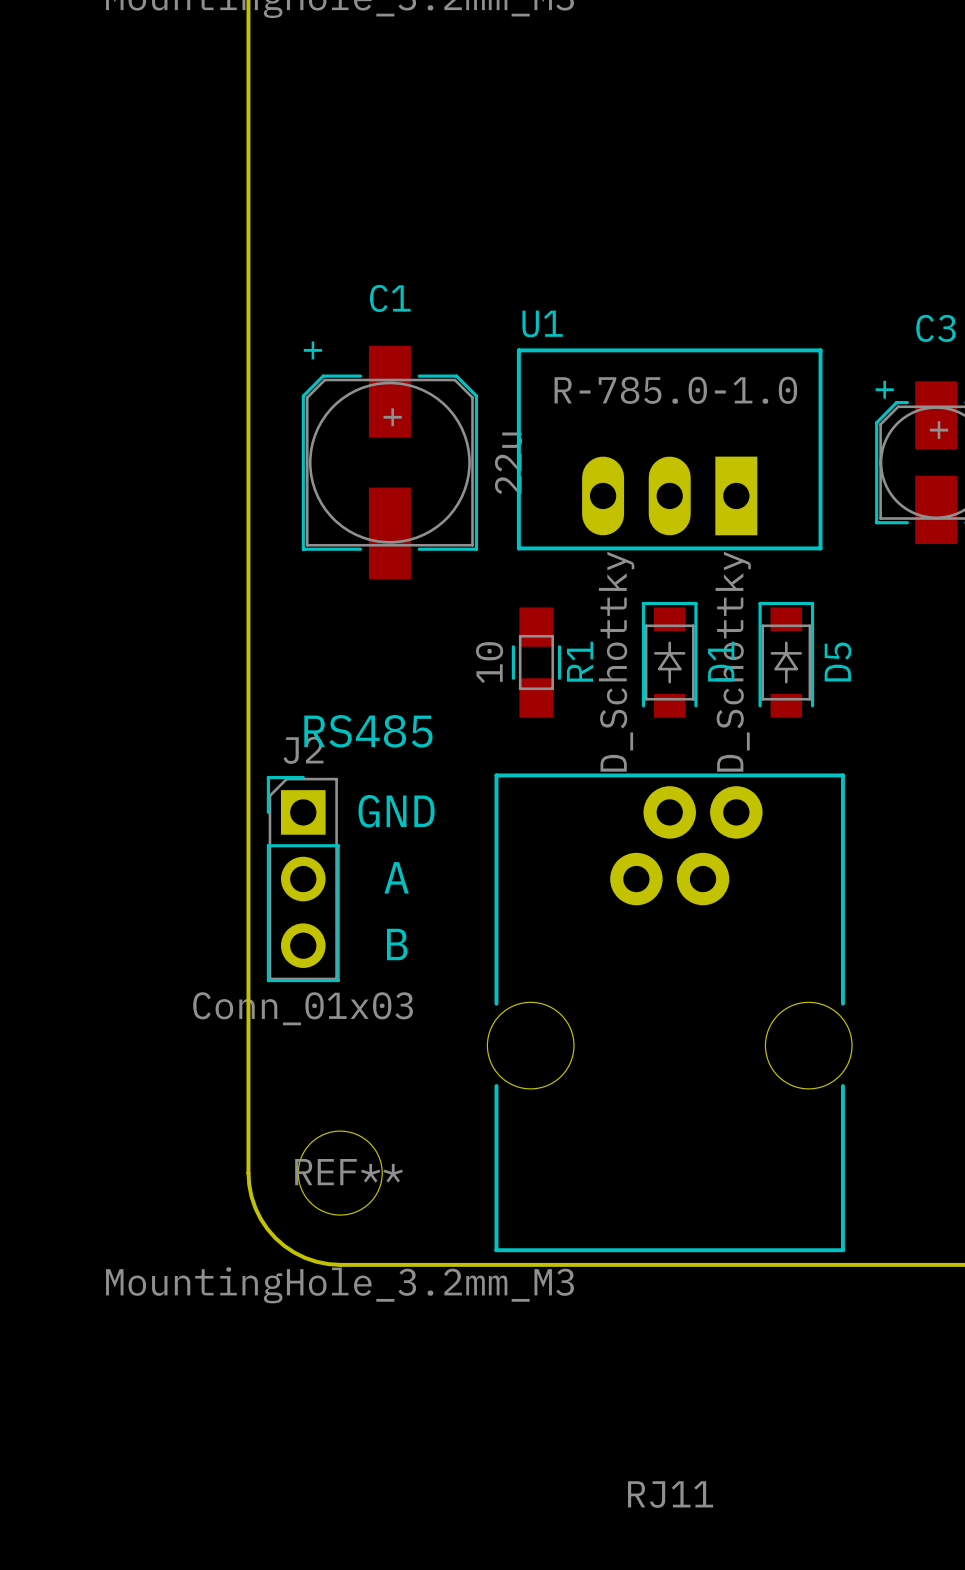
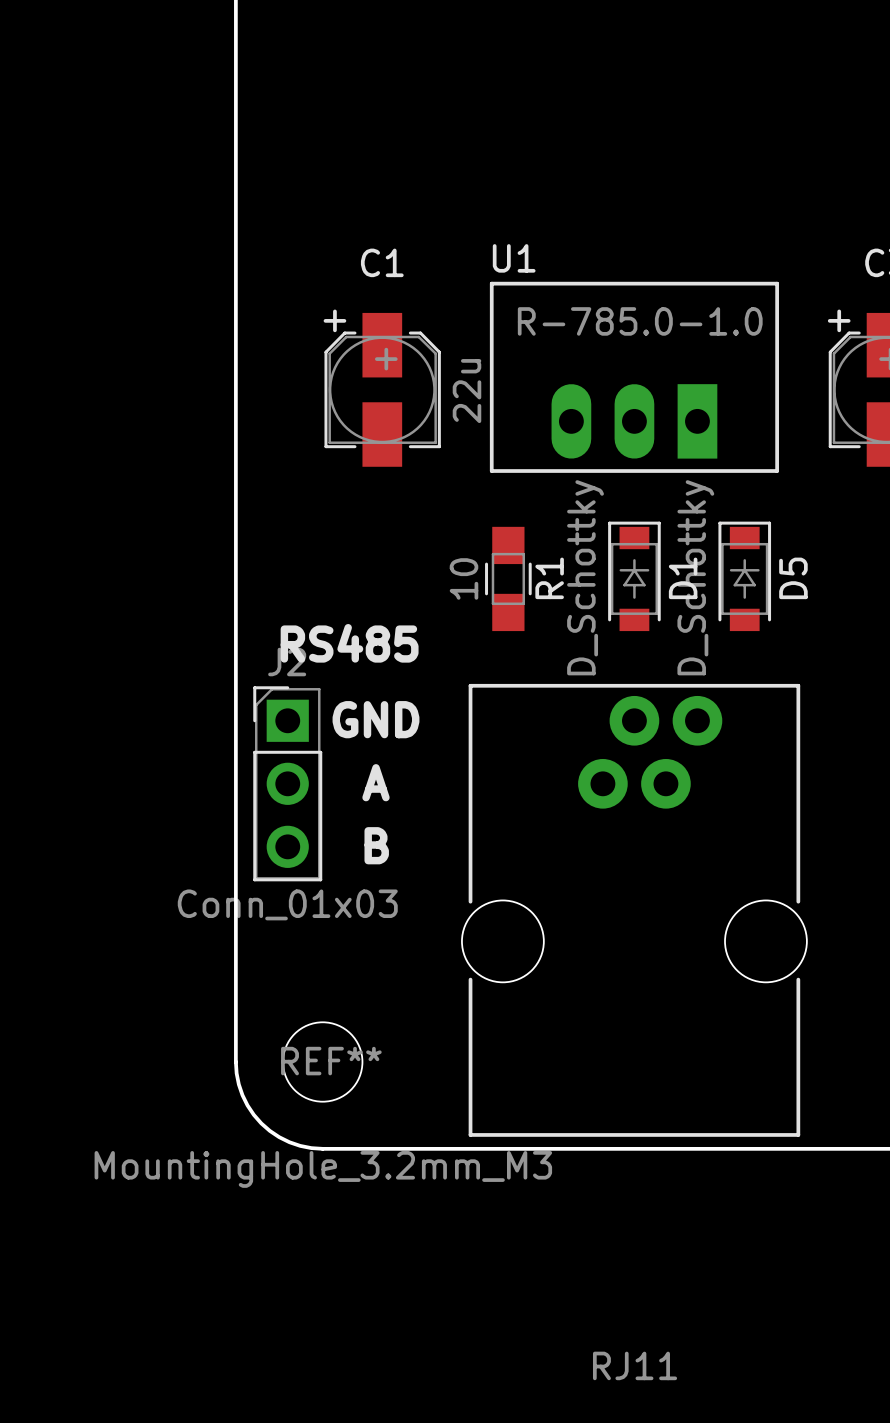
C1 footprint: [301, 345, 479, 580] -> [324, 312, 441, 467]

